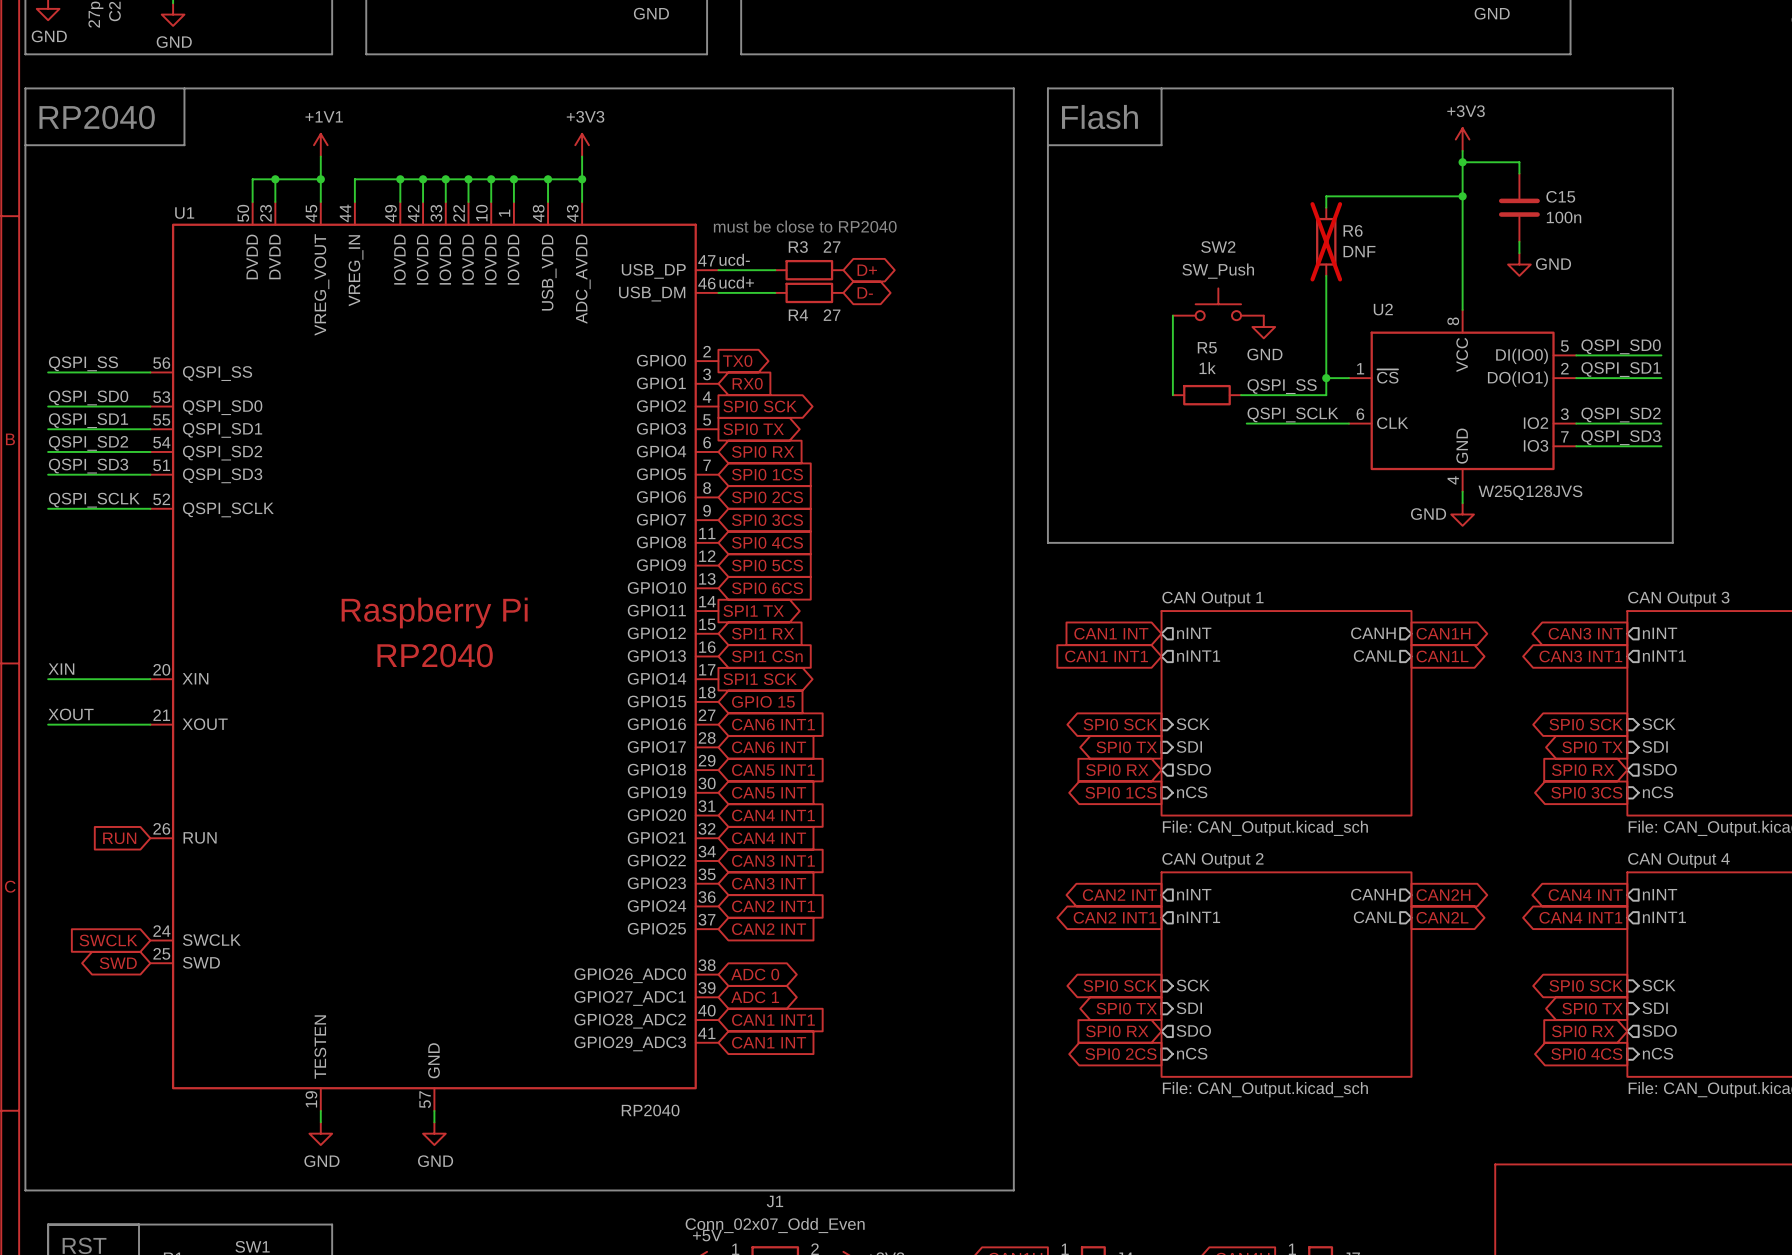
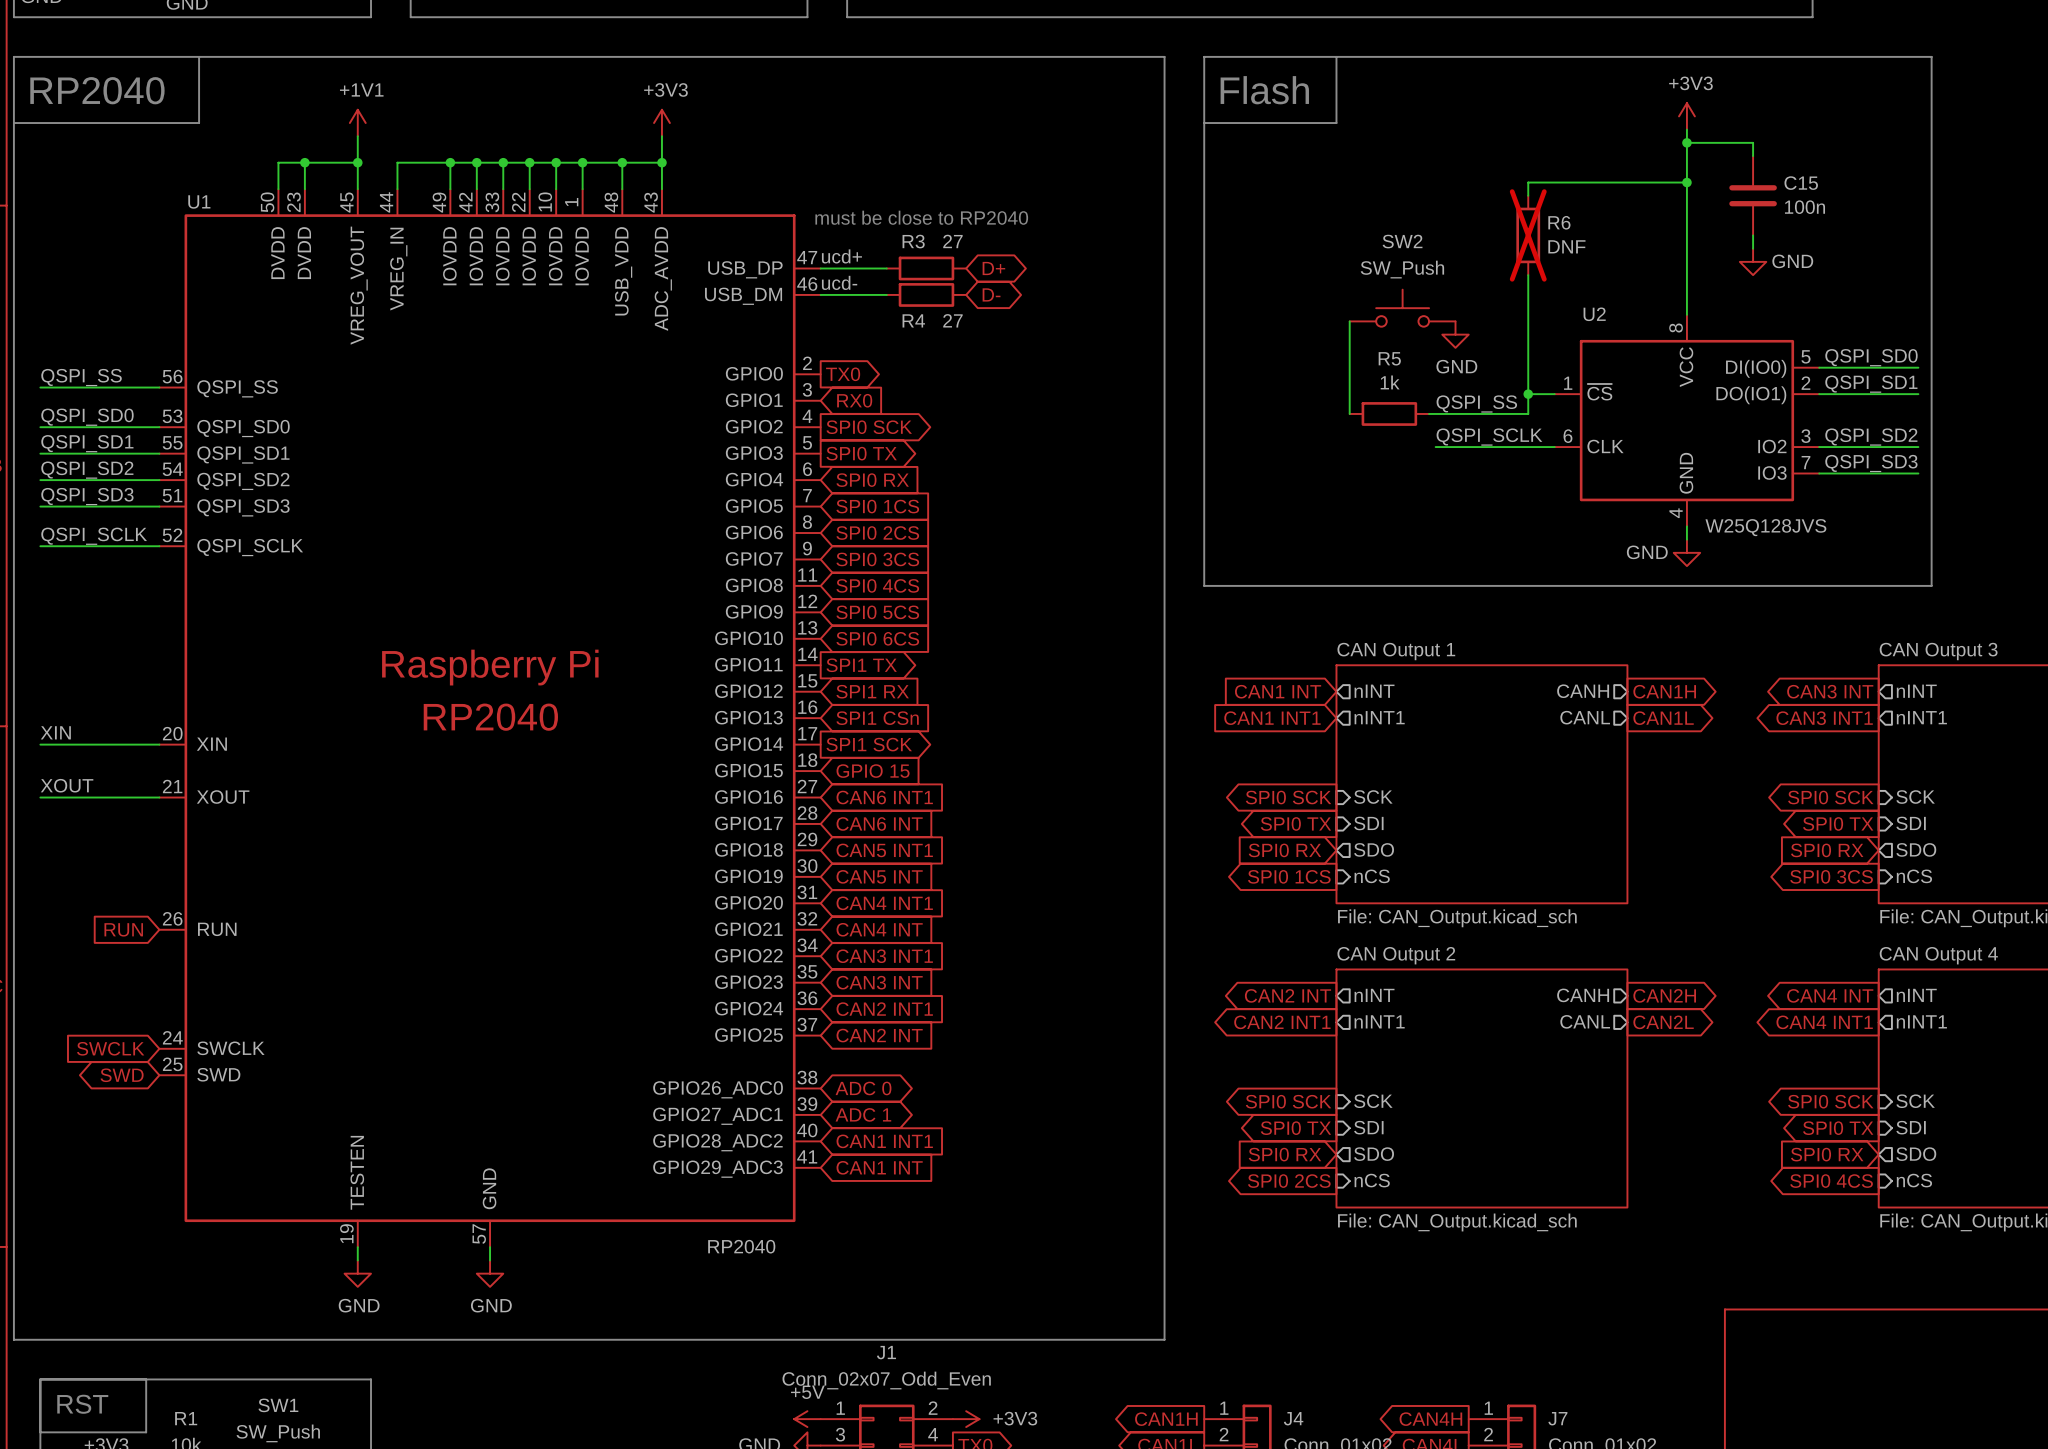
label: ucd- (734, 259) -> ucd+ (841, 256)
label: ucd+ (736, 282) -> ucd- (839, 282)

